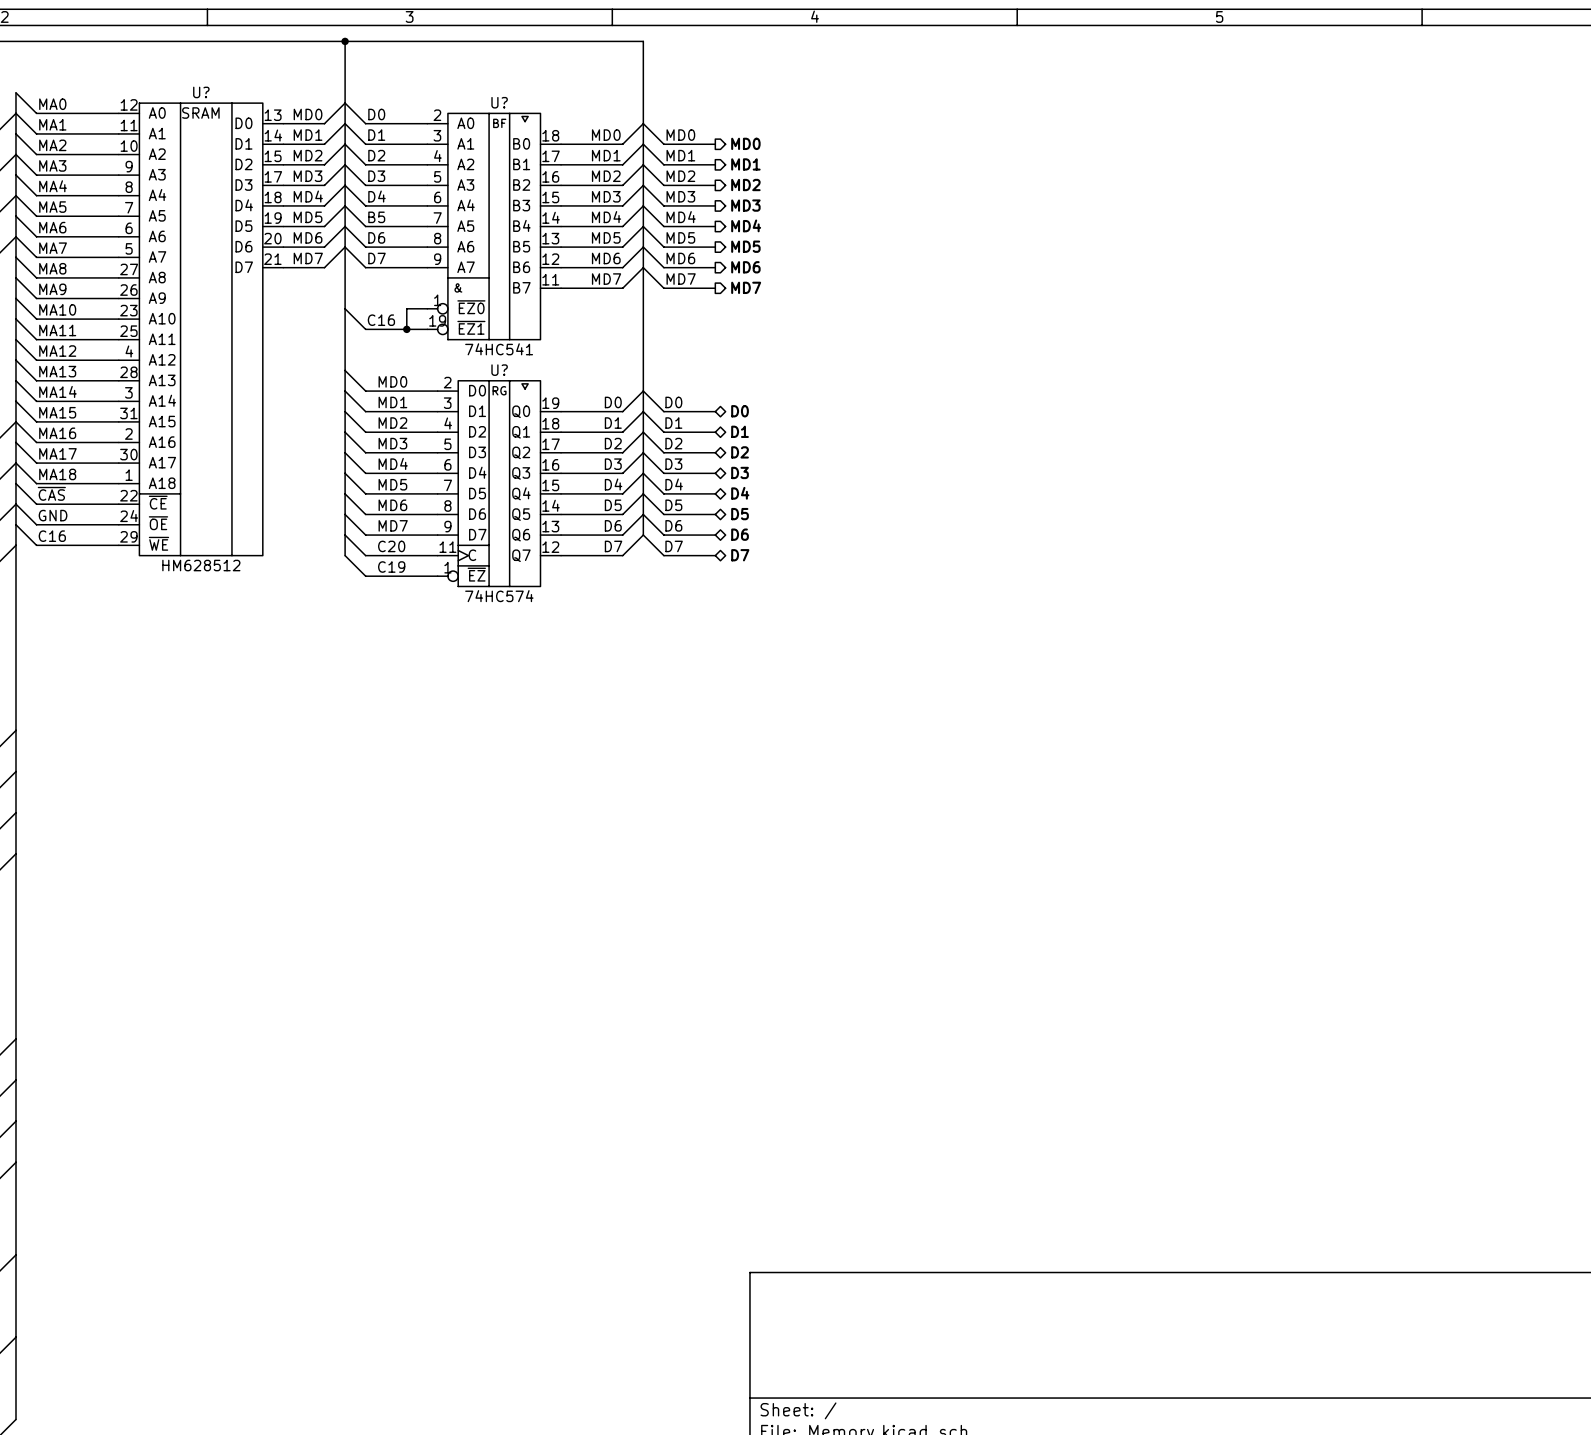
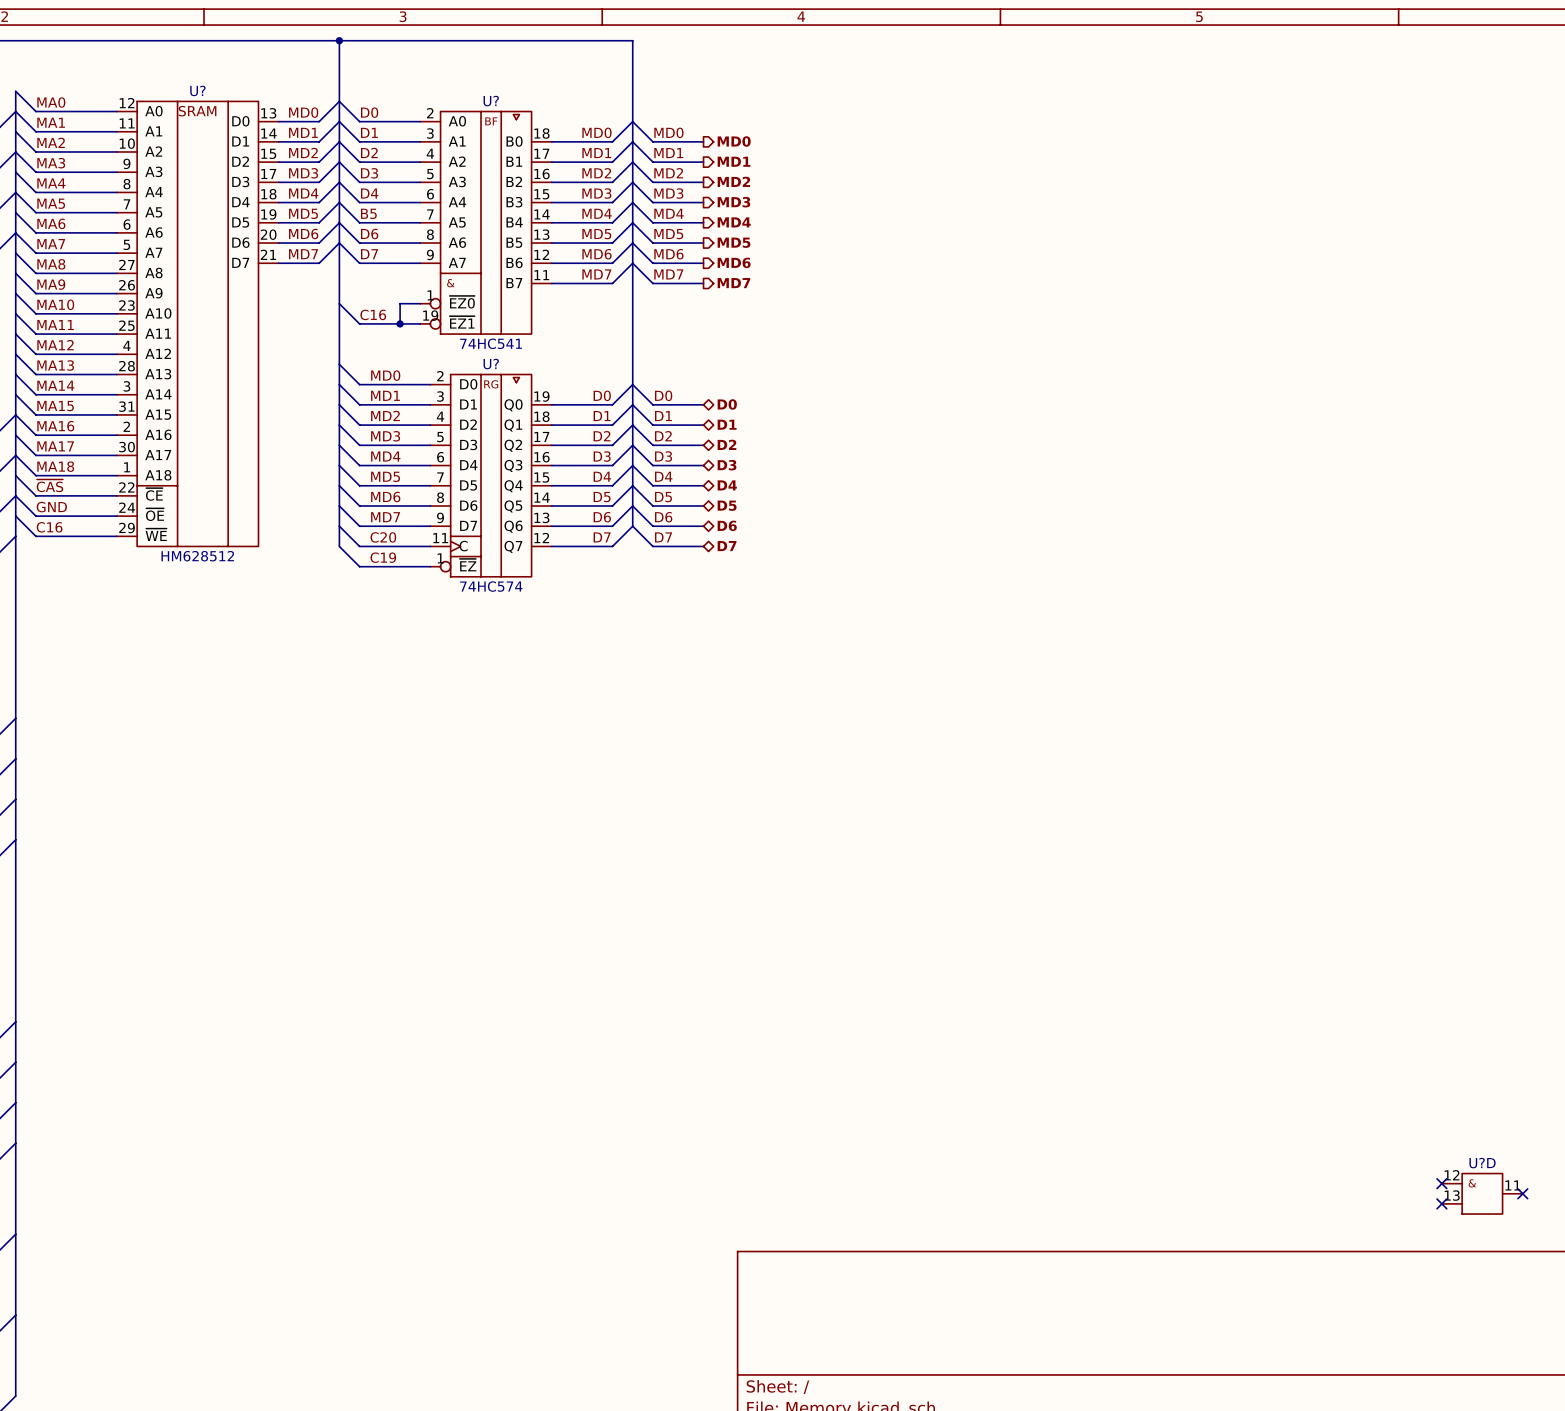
no-connect mark: none -> (1441, 1183)
U?D: none -> (1482, 1193)
no-connect mark: none -> (1522, 1193)
no-connect mark: none -> (1441, 1203)

